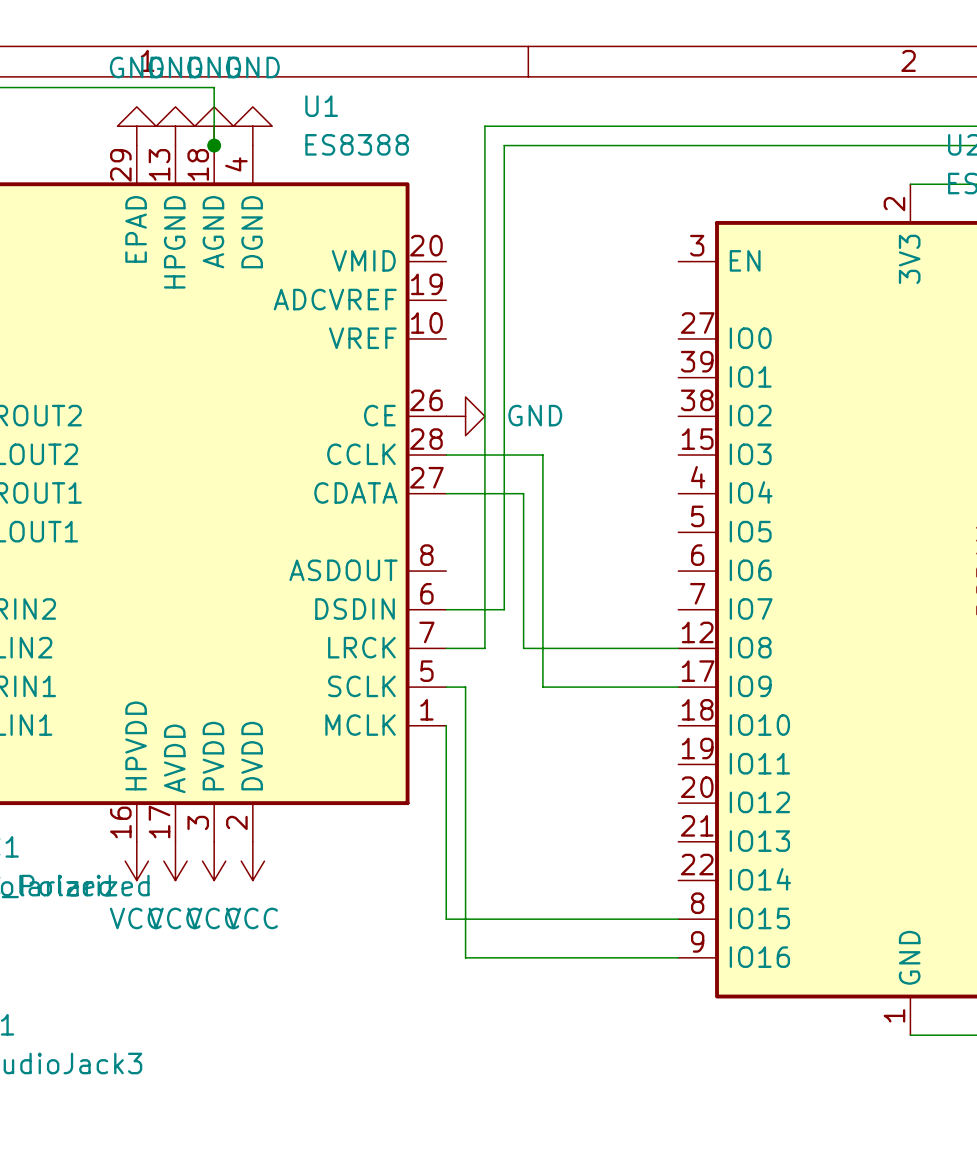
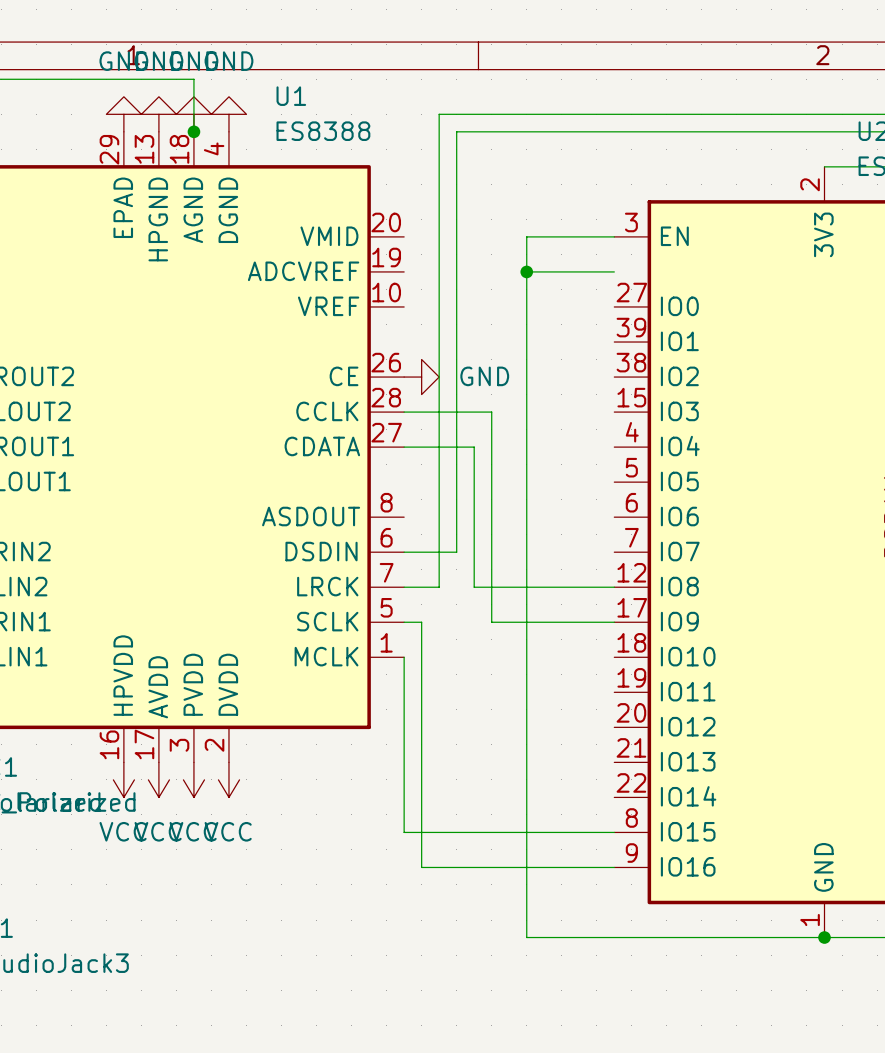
wire: none -> (614, 236) (526, 236) (526, 937) (824, 937)
wire: none -> (526, 271) (614, 271)
junction: none -> (526, 271)
junction: none -> (824, 937)

